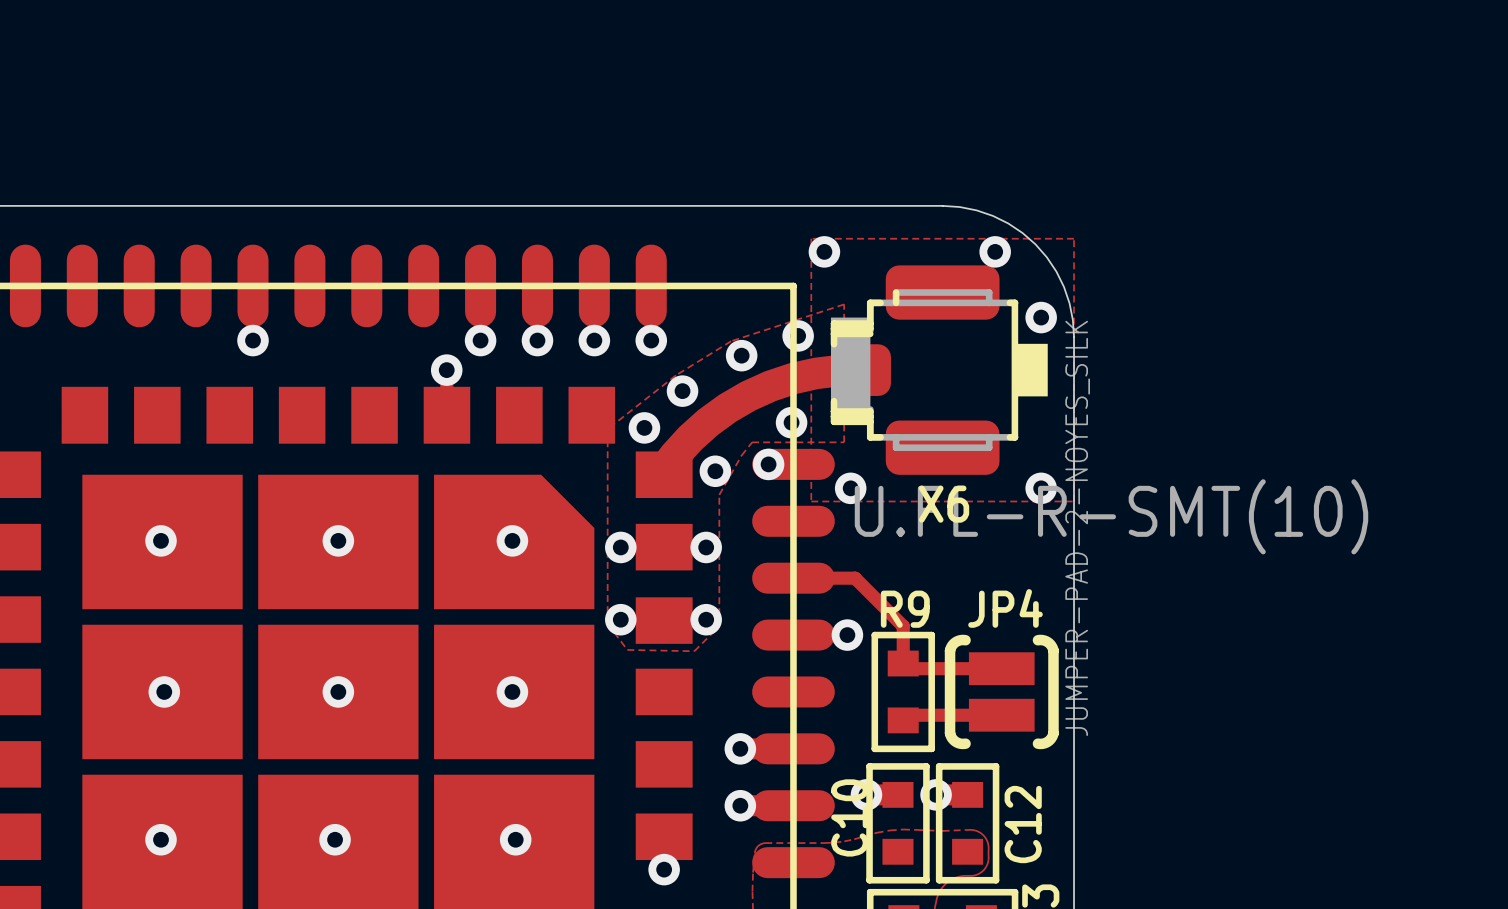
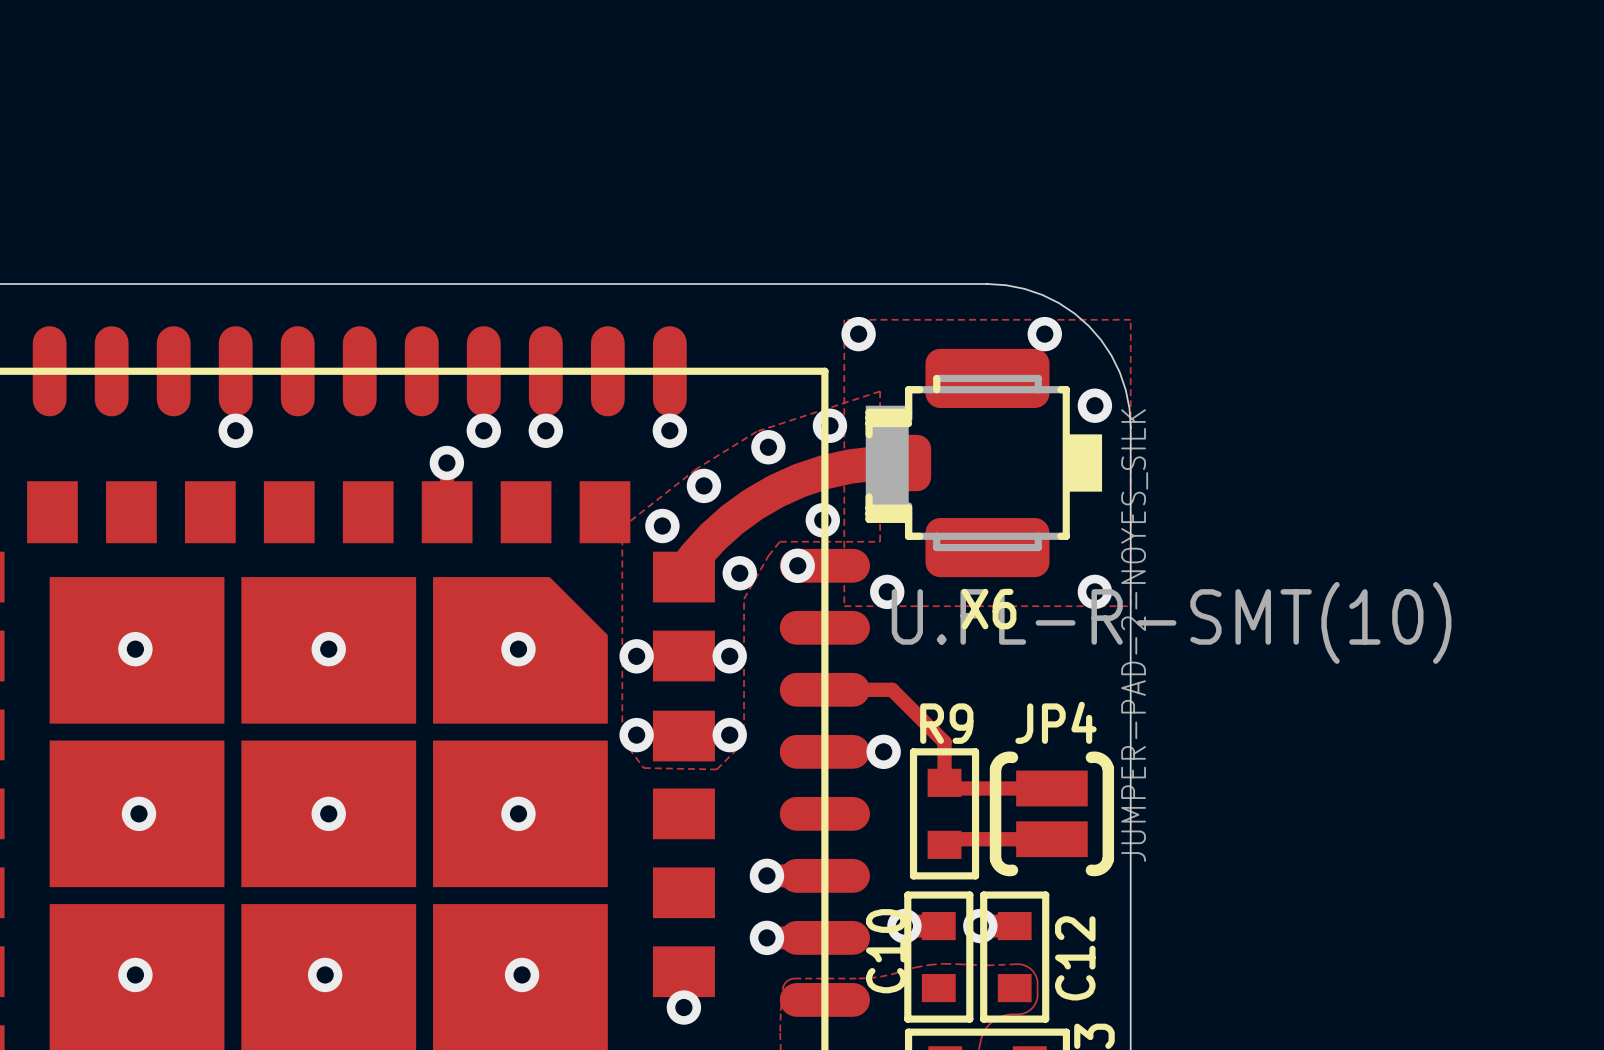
via: (594, 340) -> none

